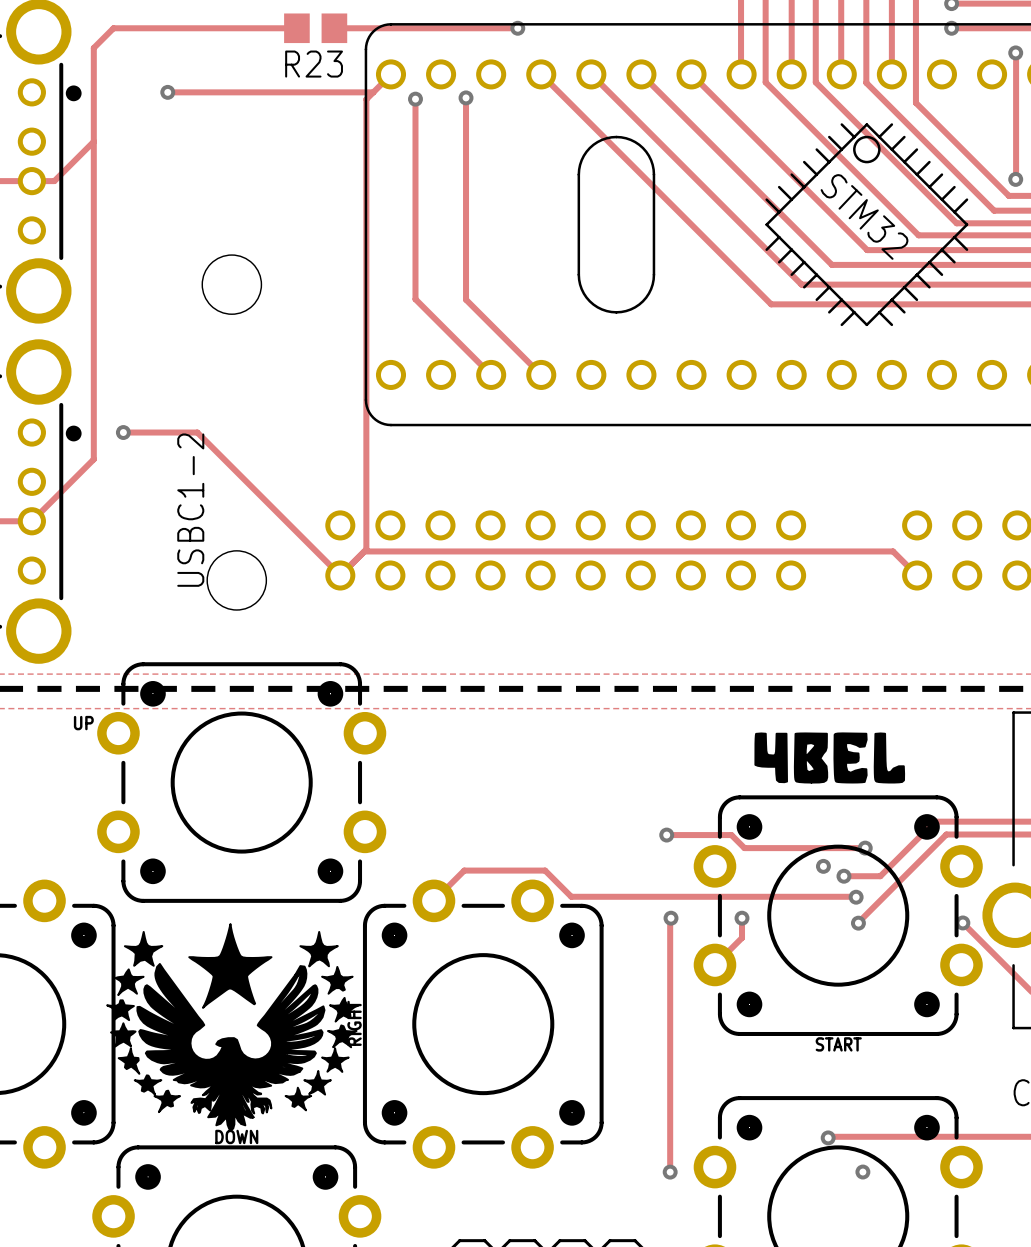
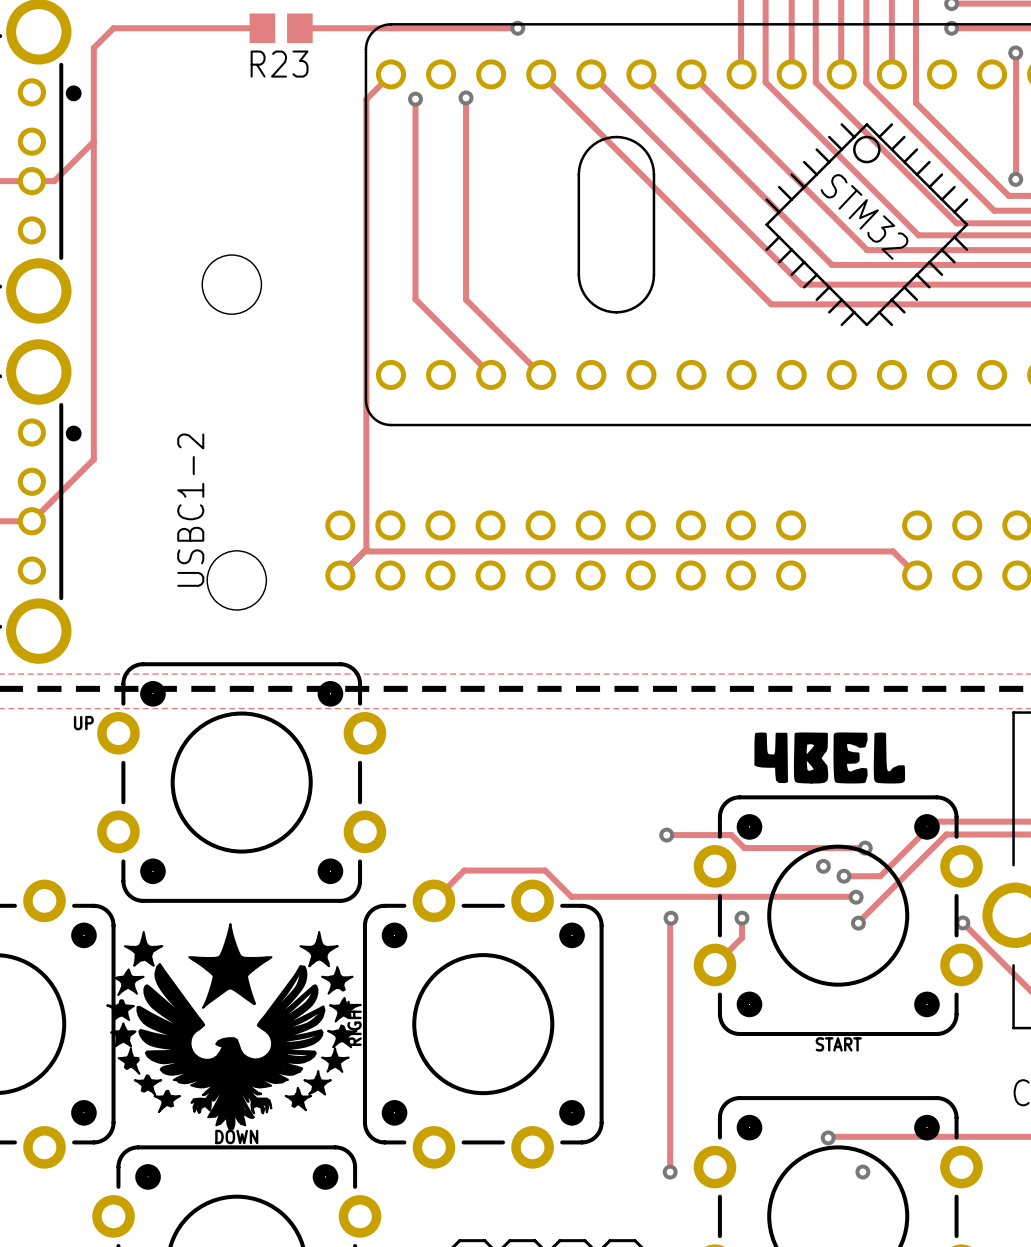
track: (262, 28) (296, 28) -> (299, 28) (334, 28)
R23 position: (315, 28) -> (281, 28)
track: (167, 92) (373, 92) -> none
via: (167, 92) -> none
track: (123, 432) (197, 432) (340, 575) -> none
via: (123, 432) -> none

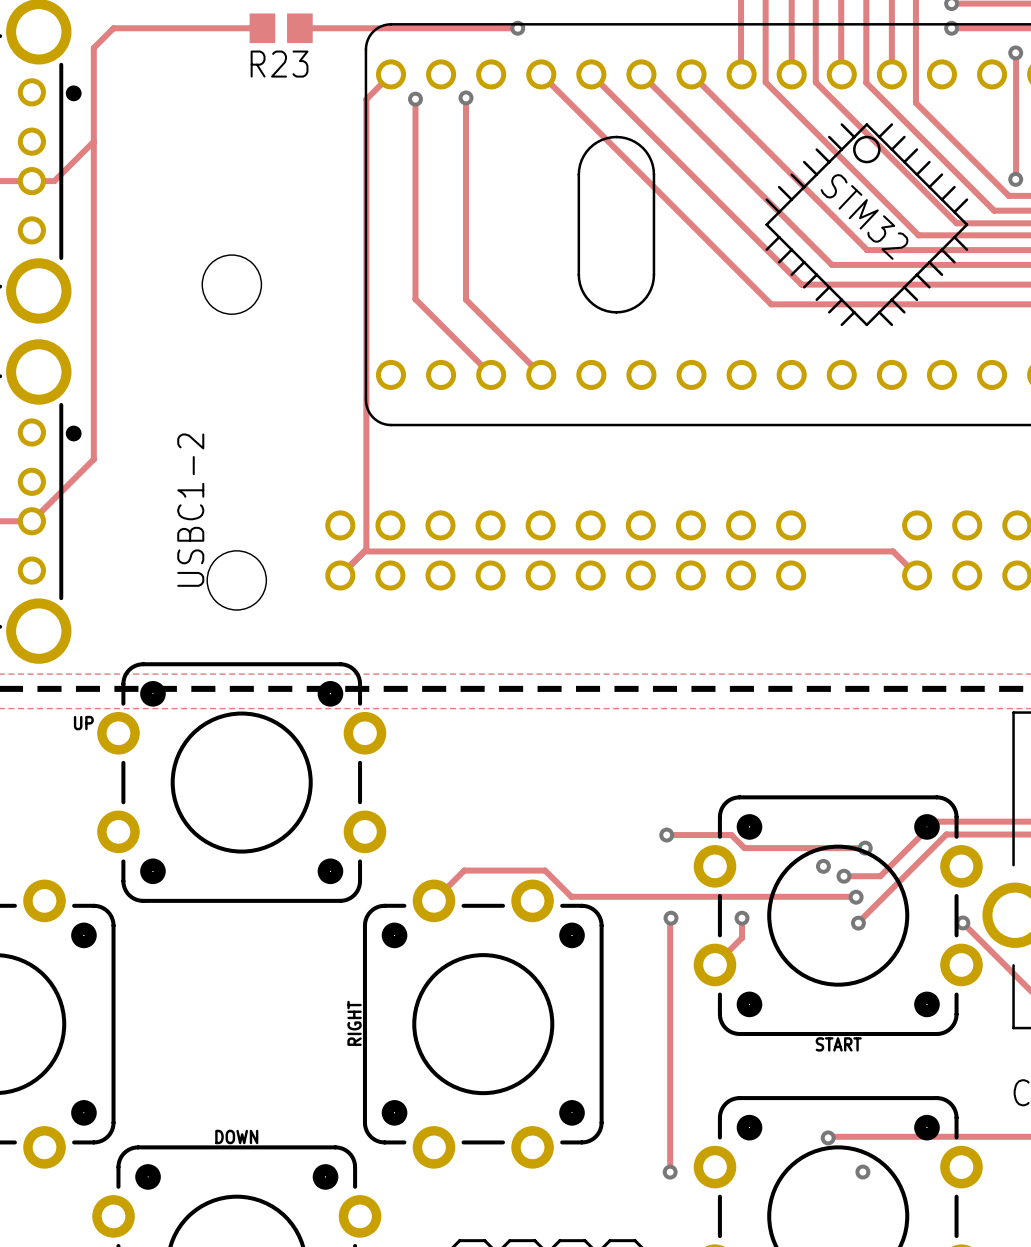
drawing: [754, 732, 906, 784] -> none
drawing: [106, 923, 360, 1132] -> none

